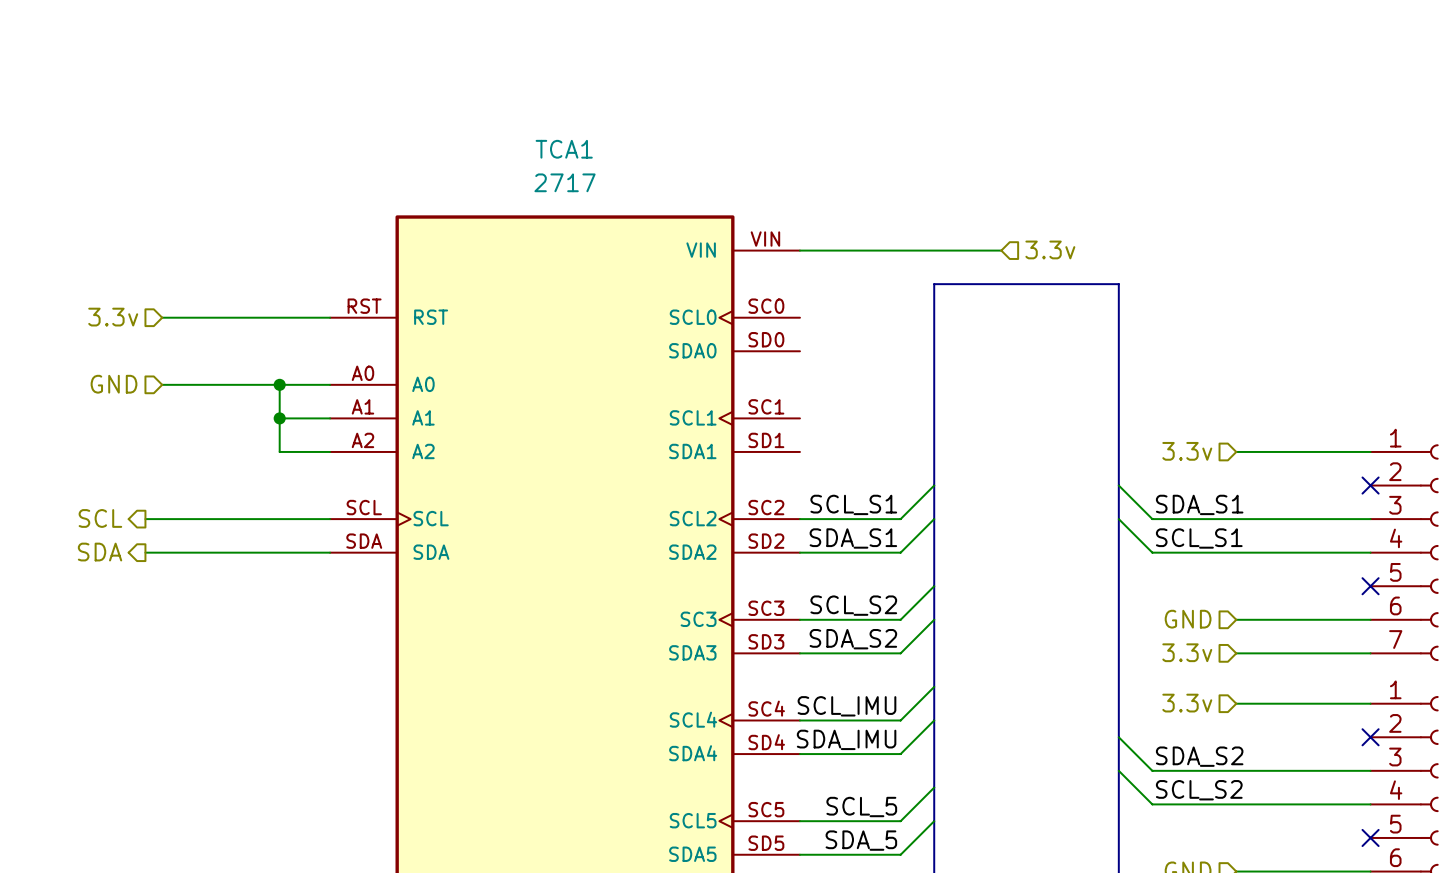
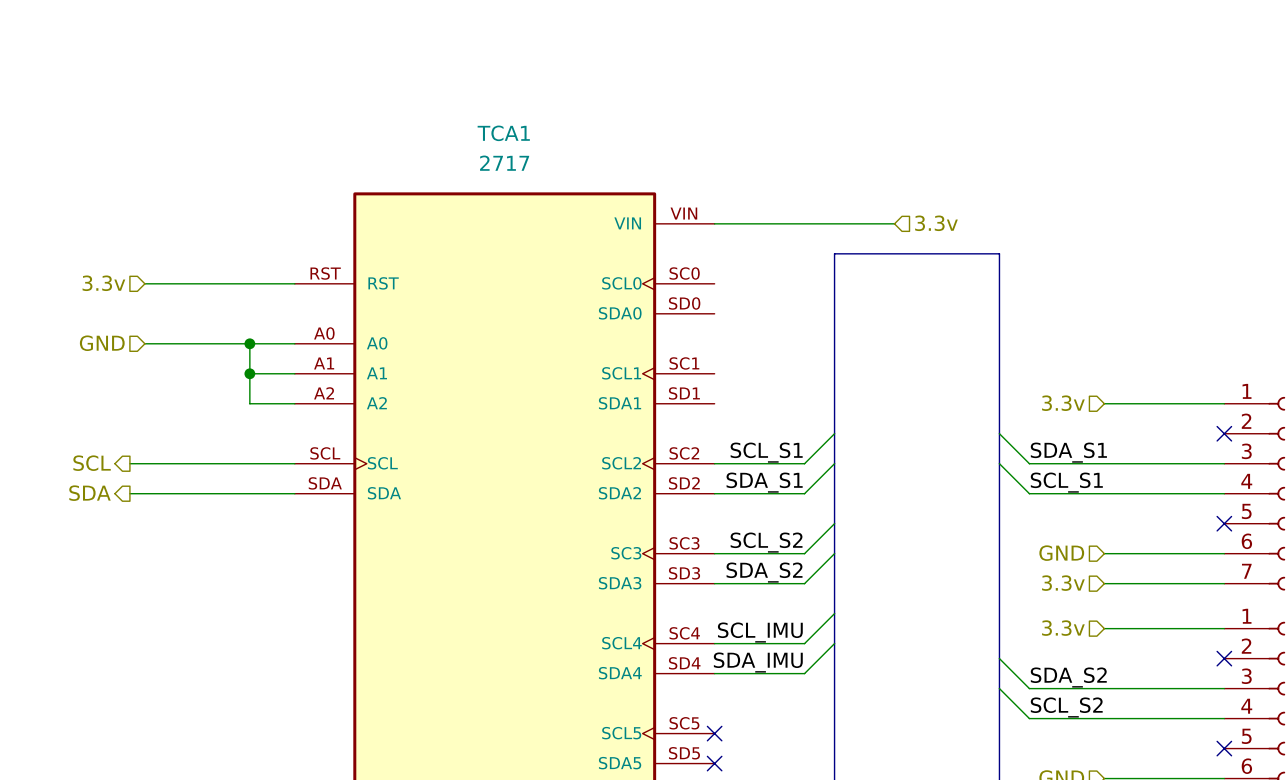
wire: (934, 787) (900, 821) (799, 821) -> none
label: SCL_5 (861, 807) -> none
no-connect mark: none -> (714, 733)
wire: (934, 821) (900, 854) (799, 854) -> none
label: SDA_5 (861, 840) -> none
no-connect mark: none -> (714, 763)

